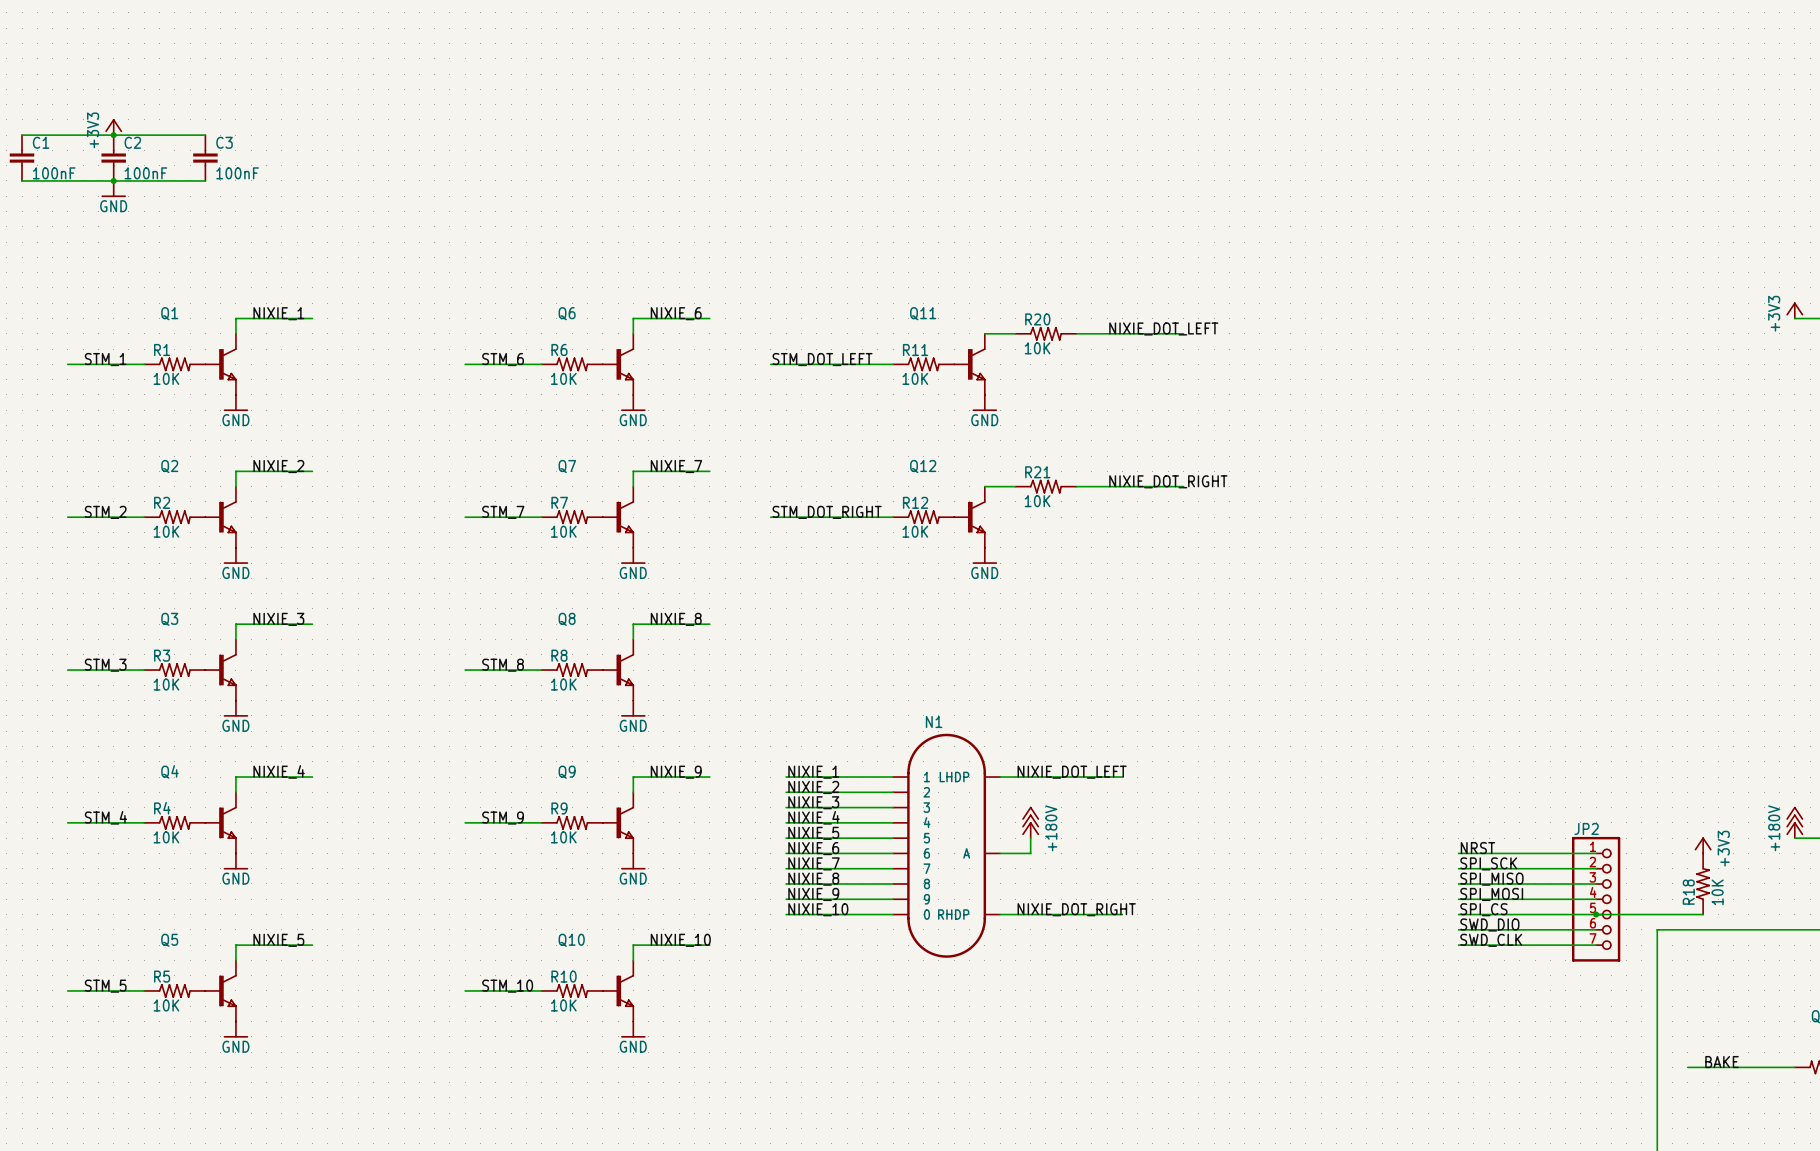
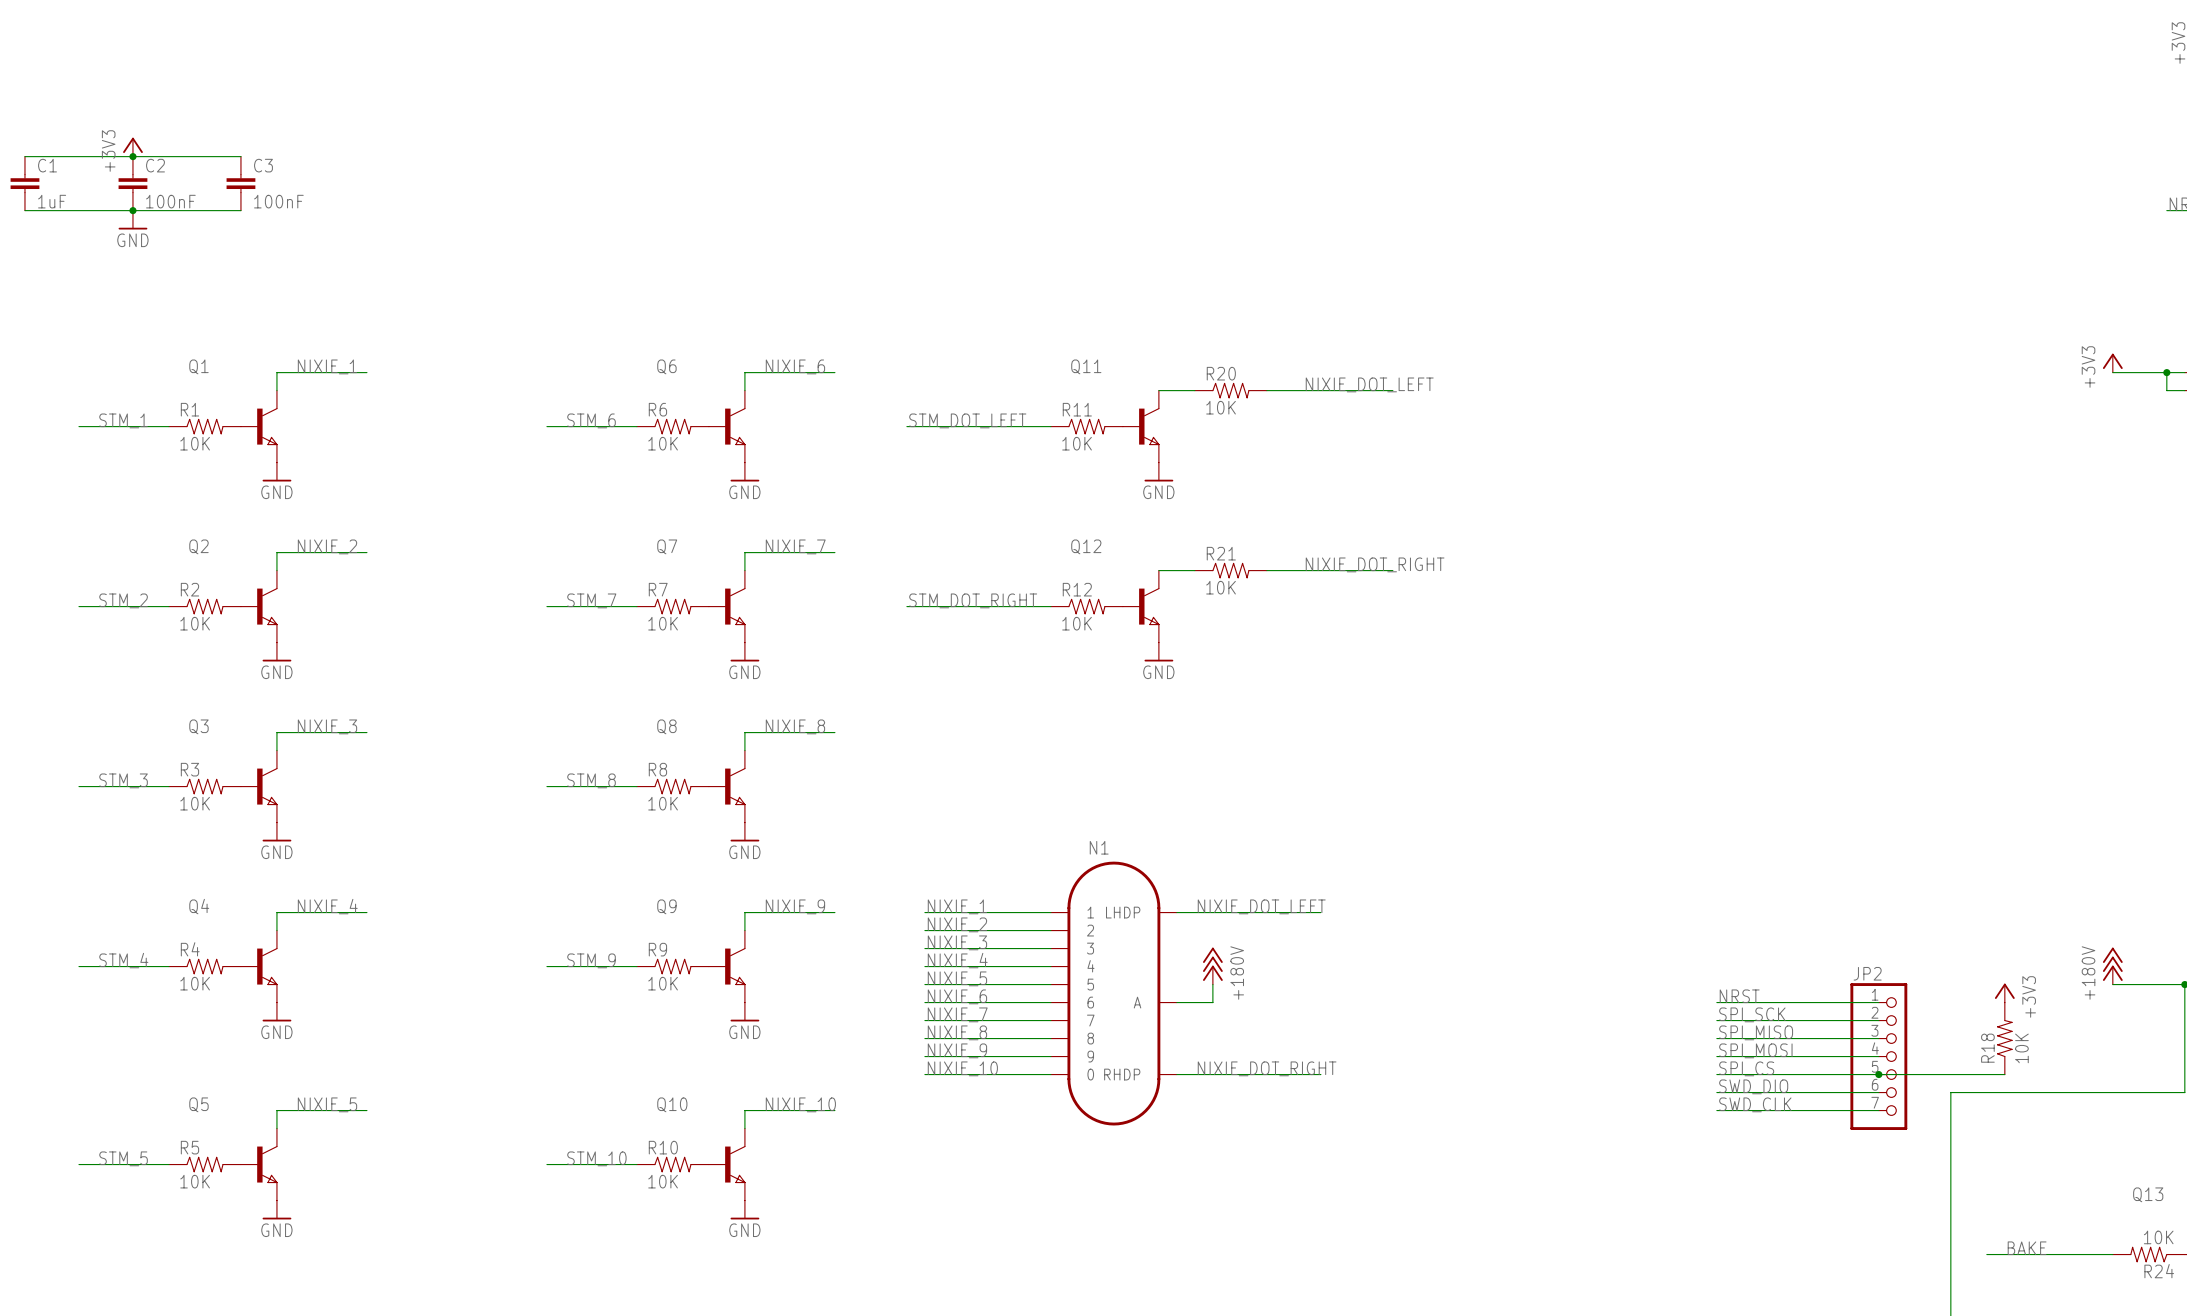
C1 value: 100nF (54, 173) -> 1uF (52, 201)

